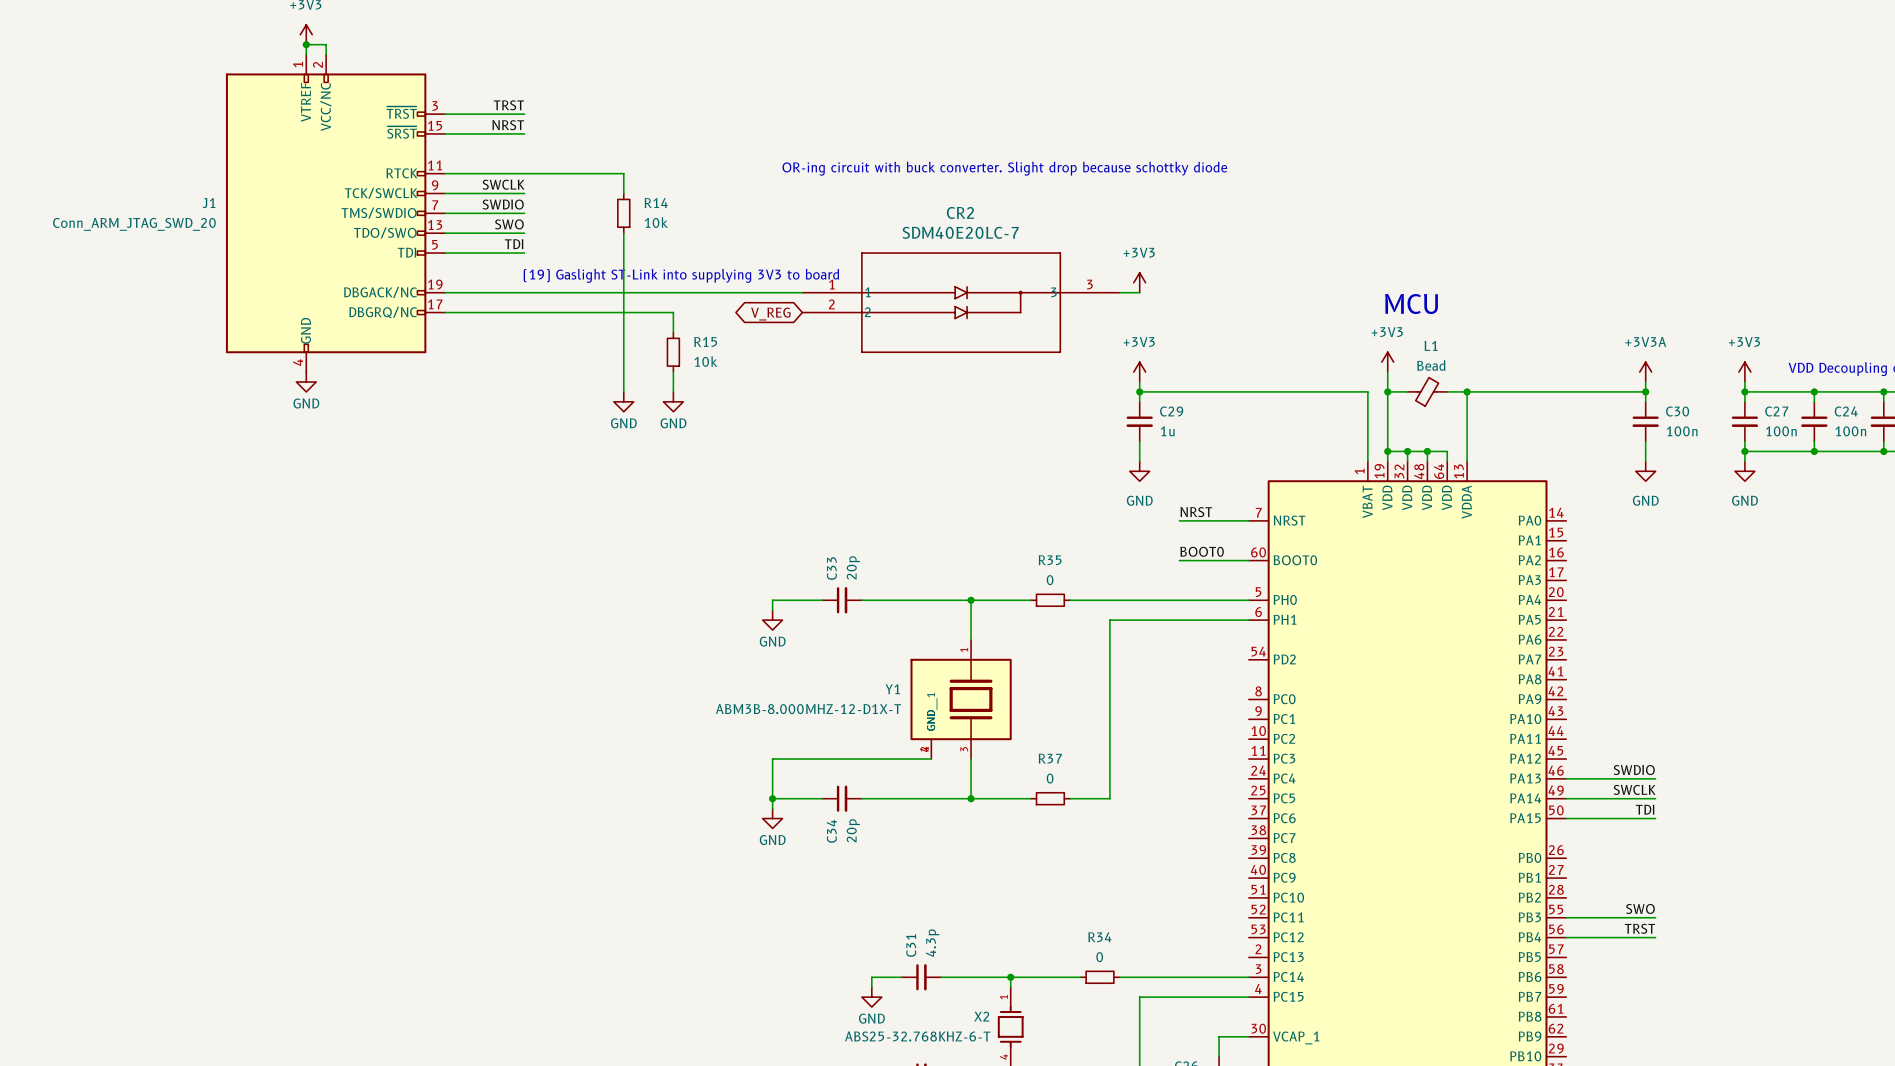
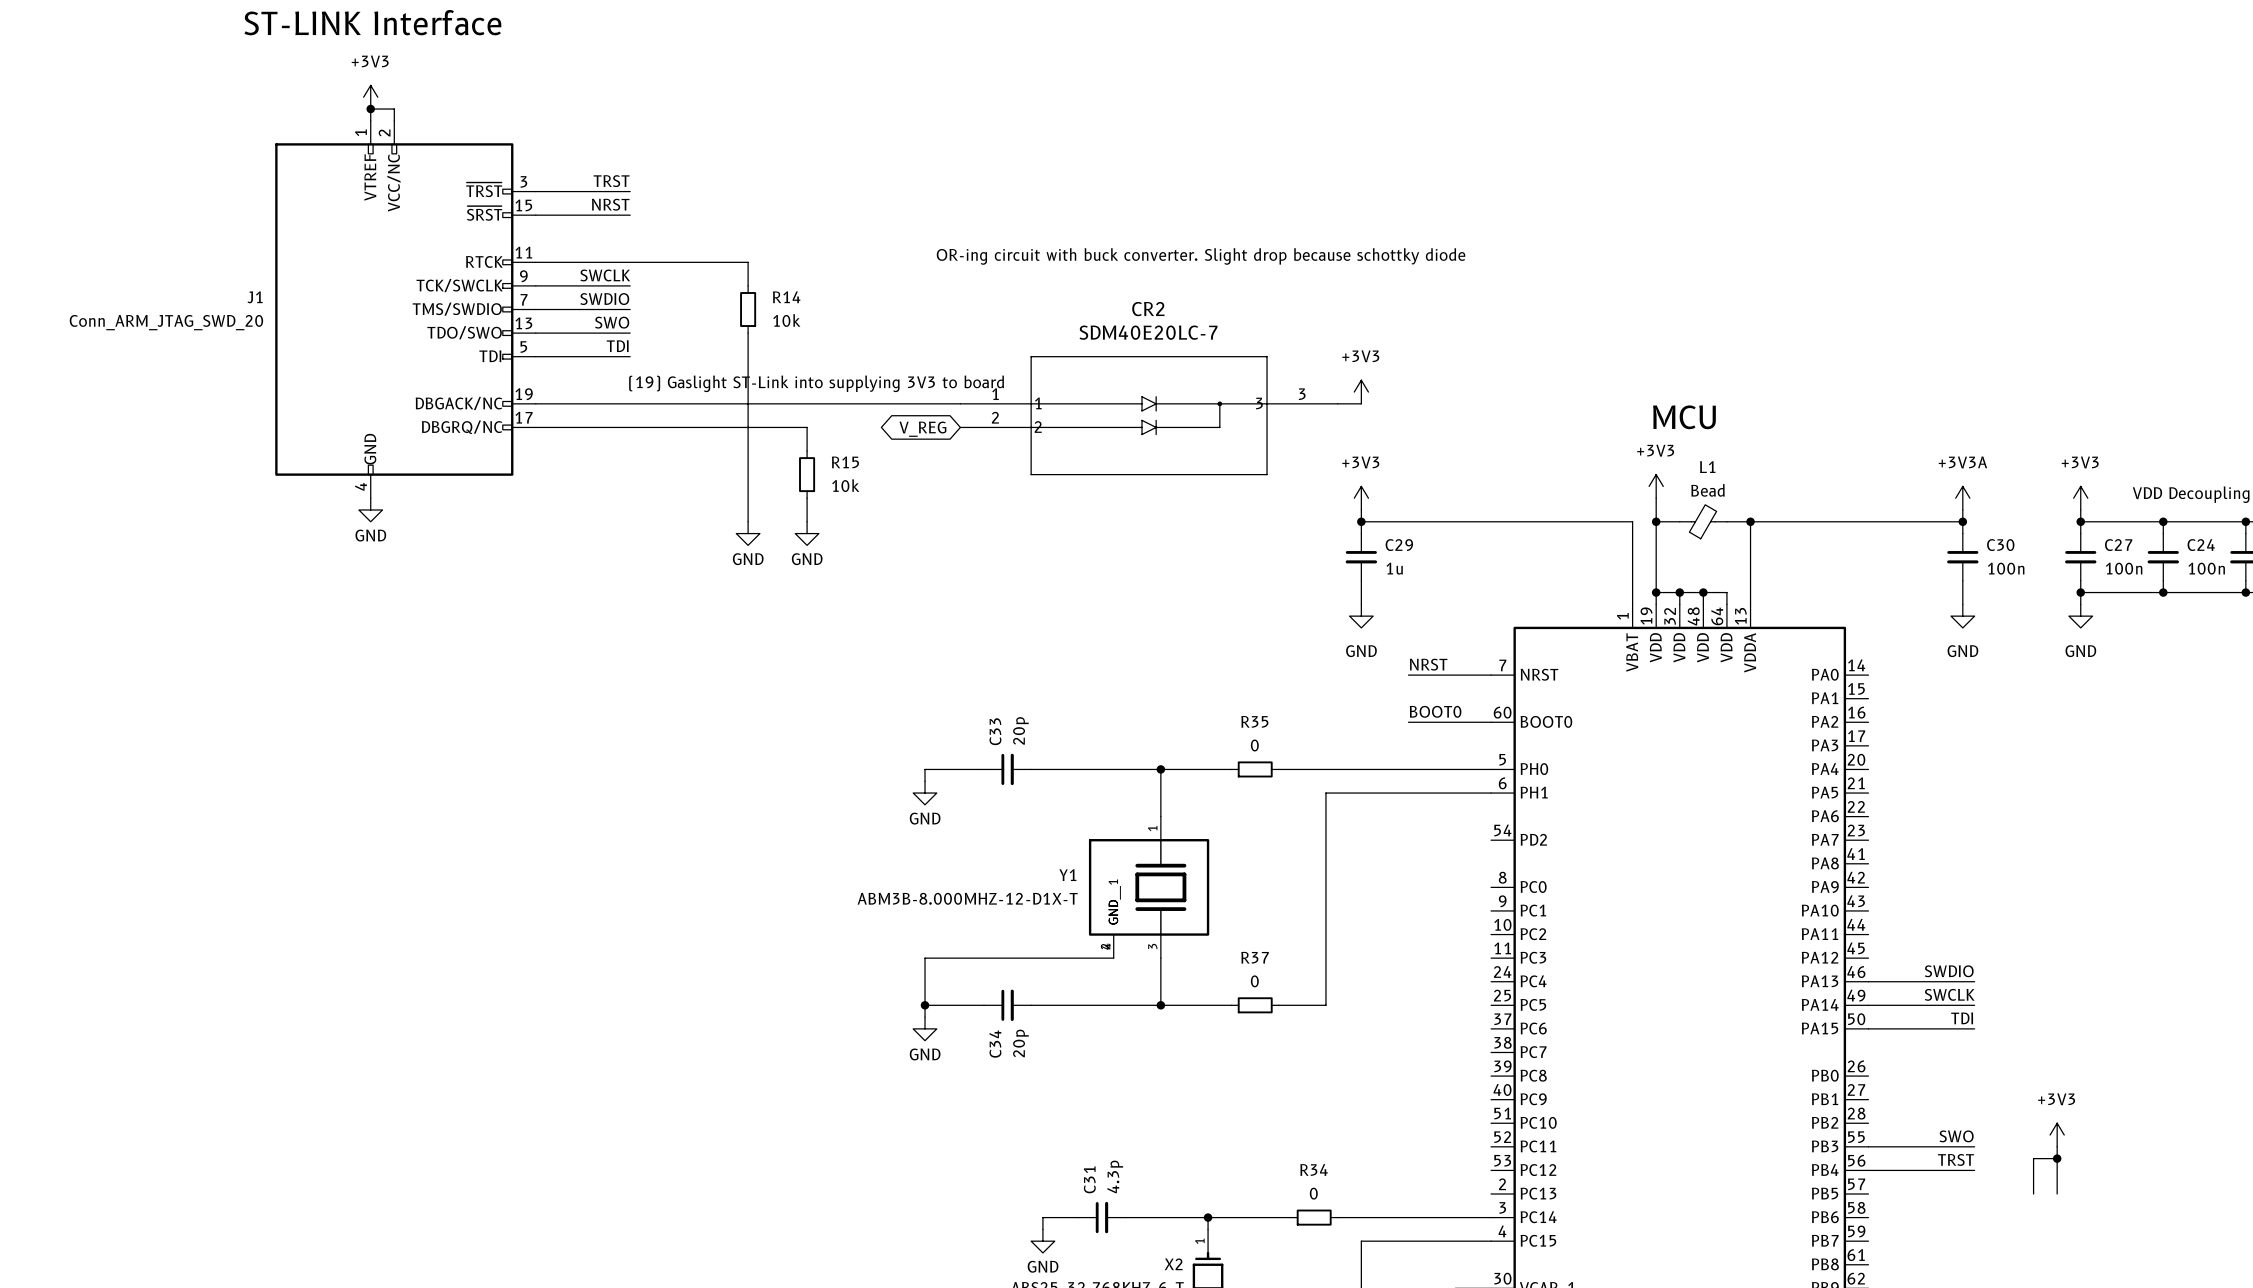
power symbol: none -> +3V3 (2057, 1135)
wire: none -> (2057, 1146) (2057, 1194)
wire: none -> (2057, 1158) (2033, 1158) (2033, 1194)
junction: none -> (2057, 1158)

